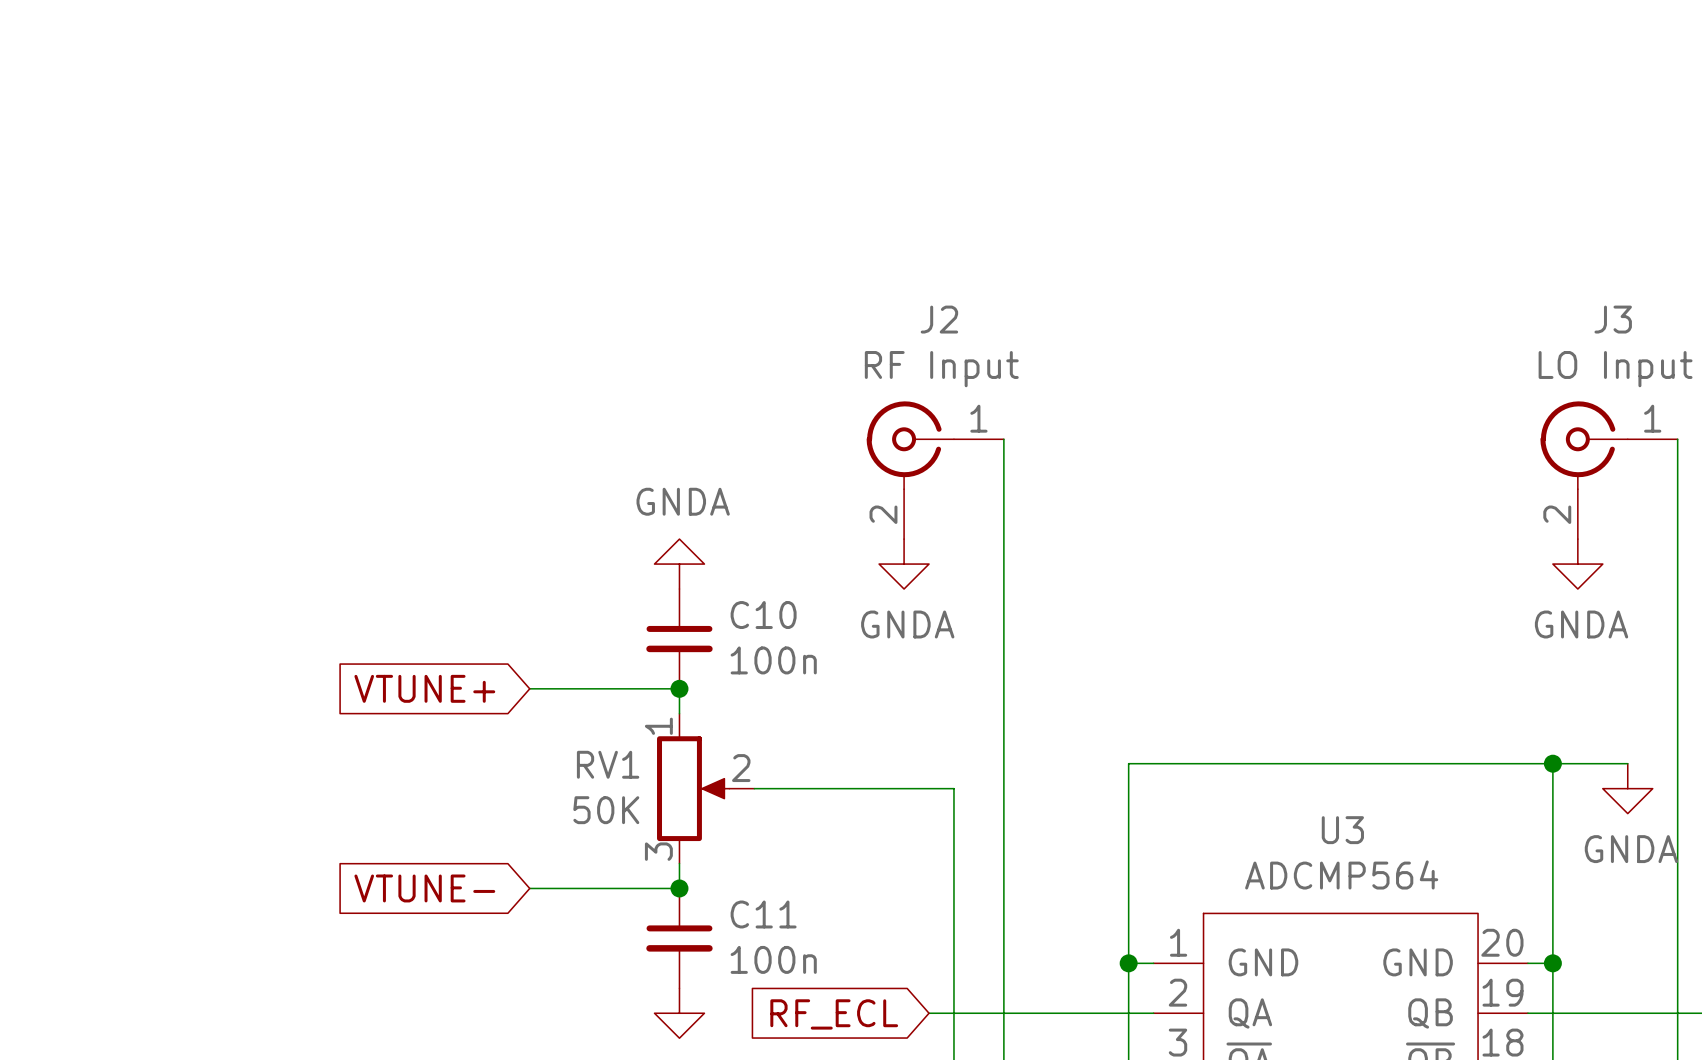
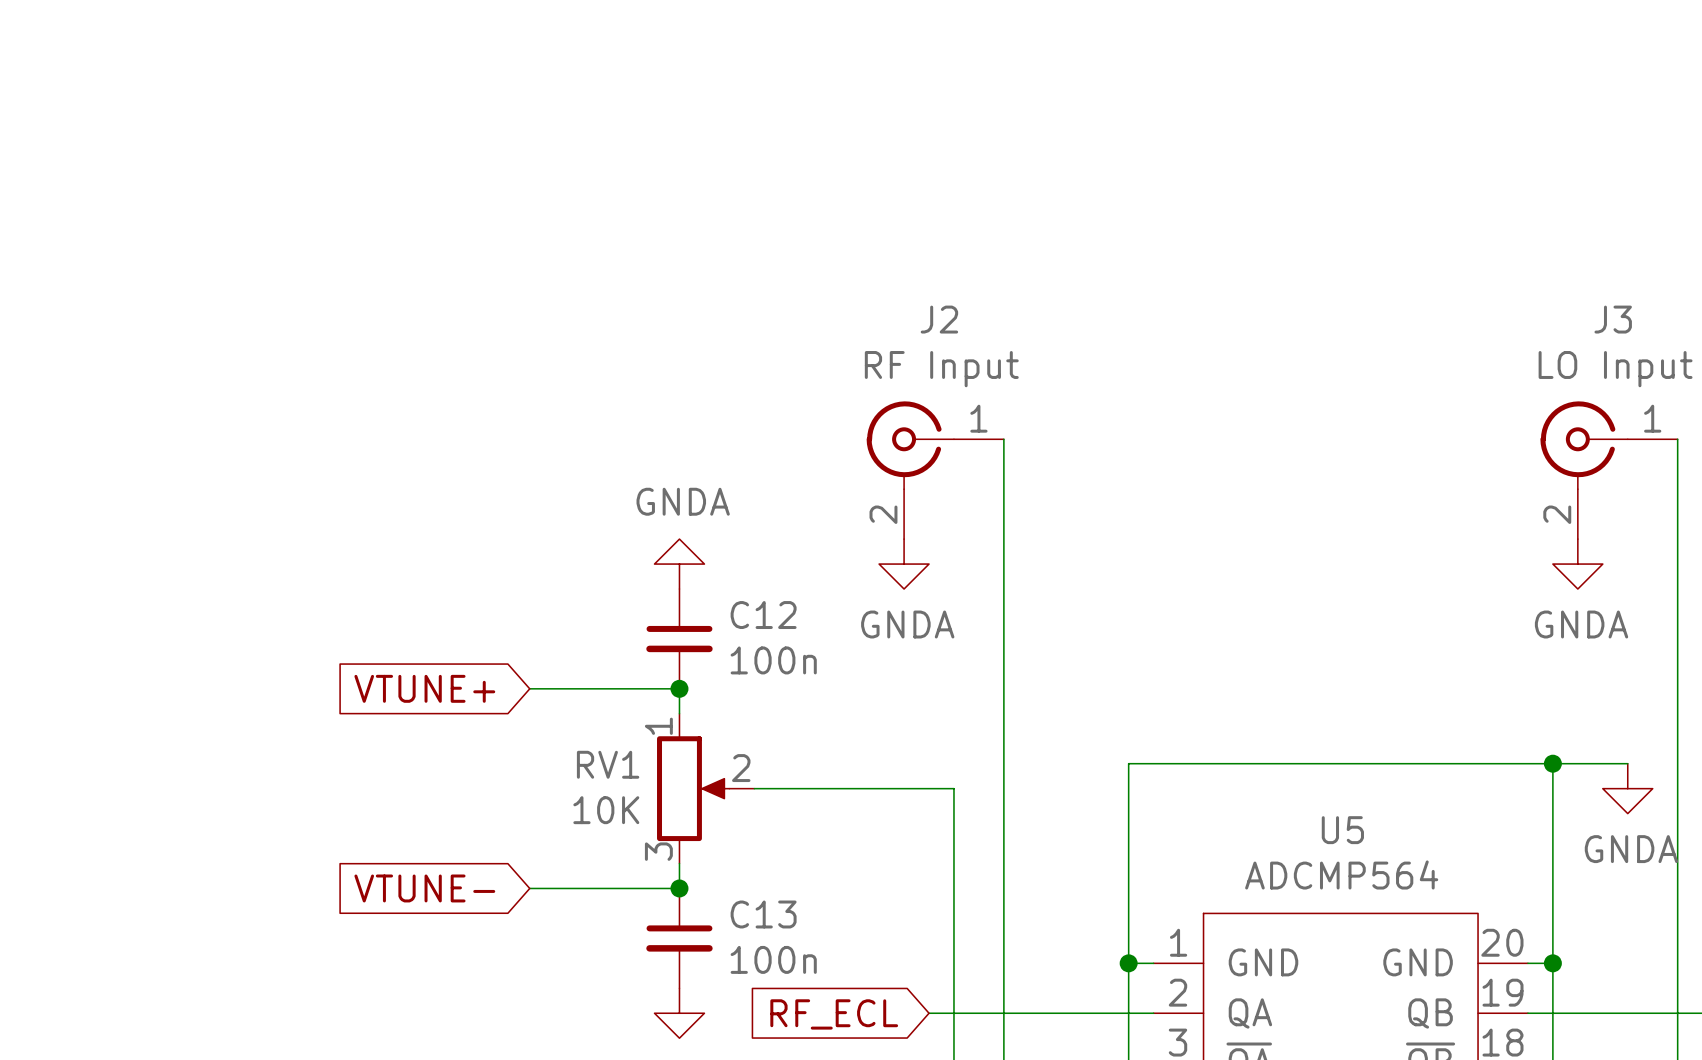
C10 name: C10 (763, 615) -> C12 (763, 615)
RV1 value: 50K (606, 810) -> 10K (606, 810)
U3 name: U3 (1342, 830) -> U5 (1342, 830)
C11 name: C11 (763, 914) -> C13 (763, 914)

